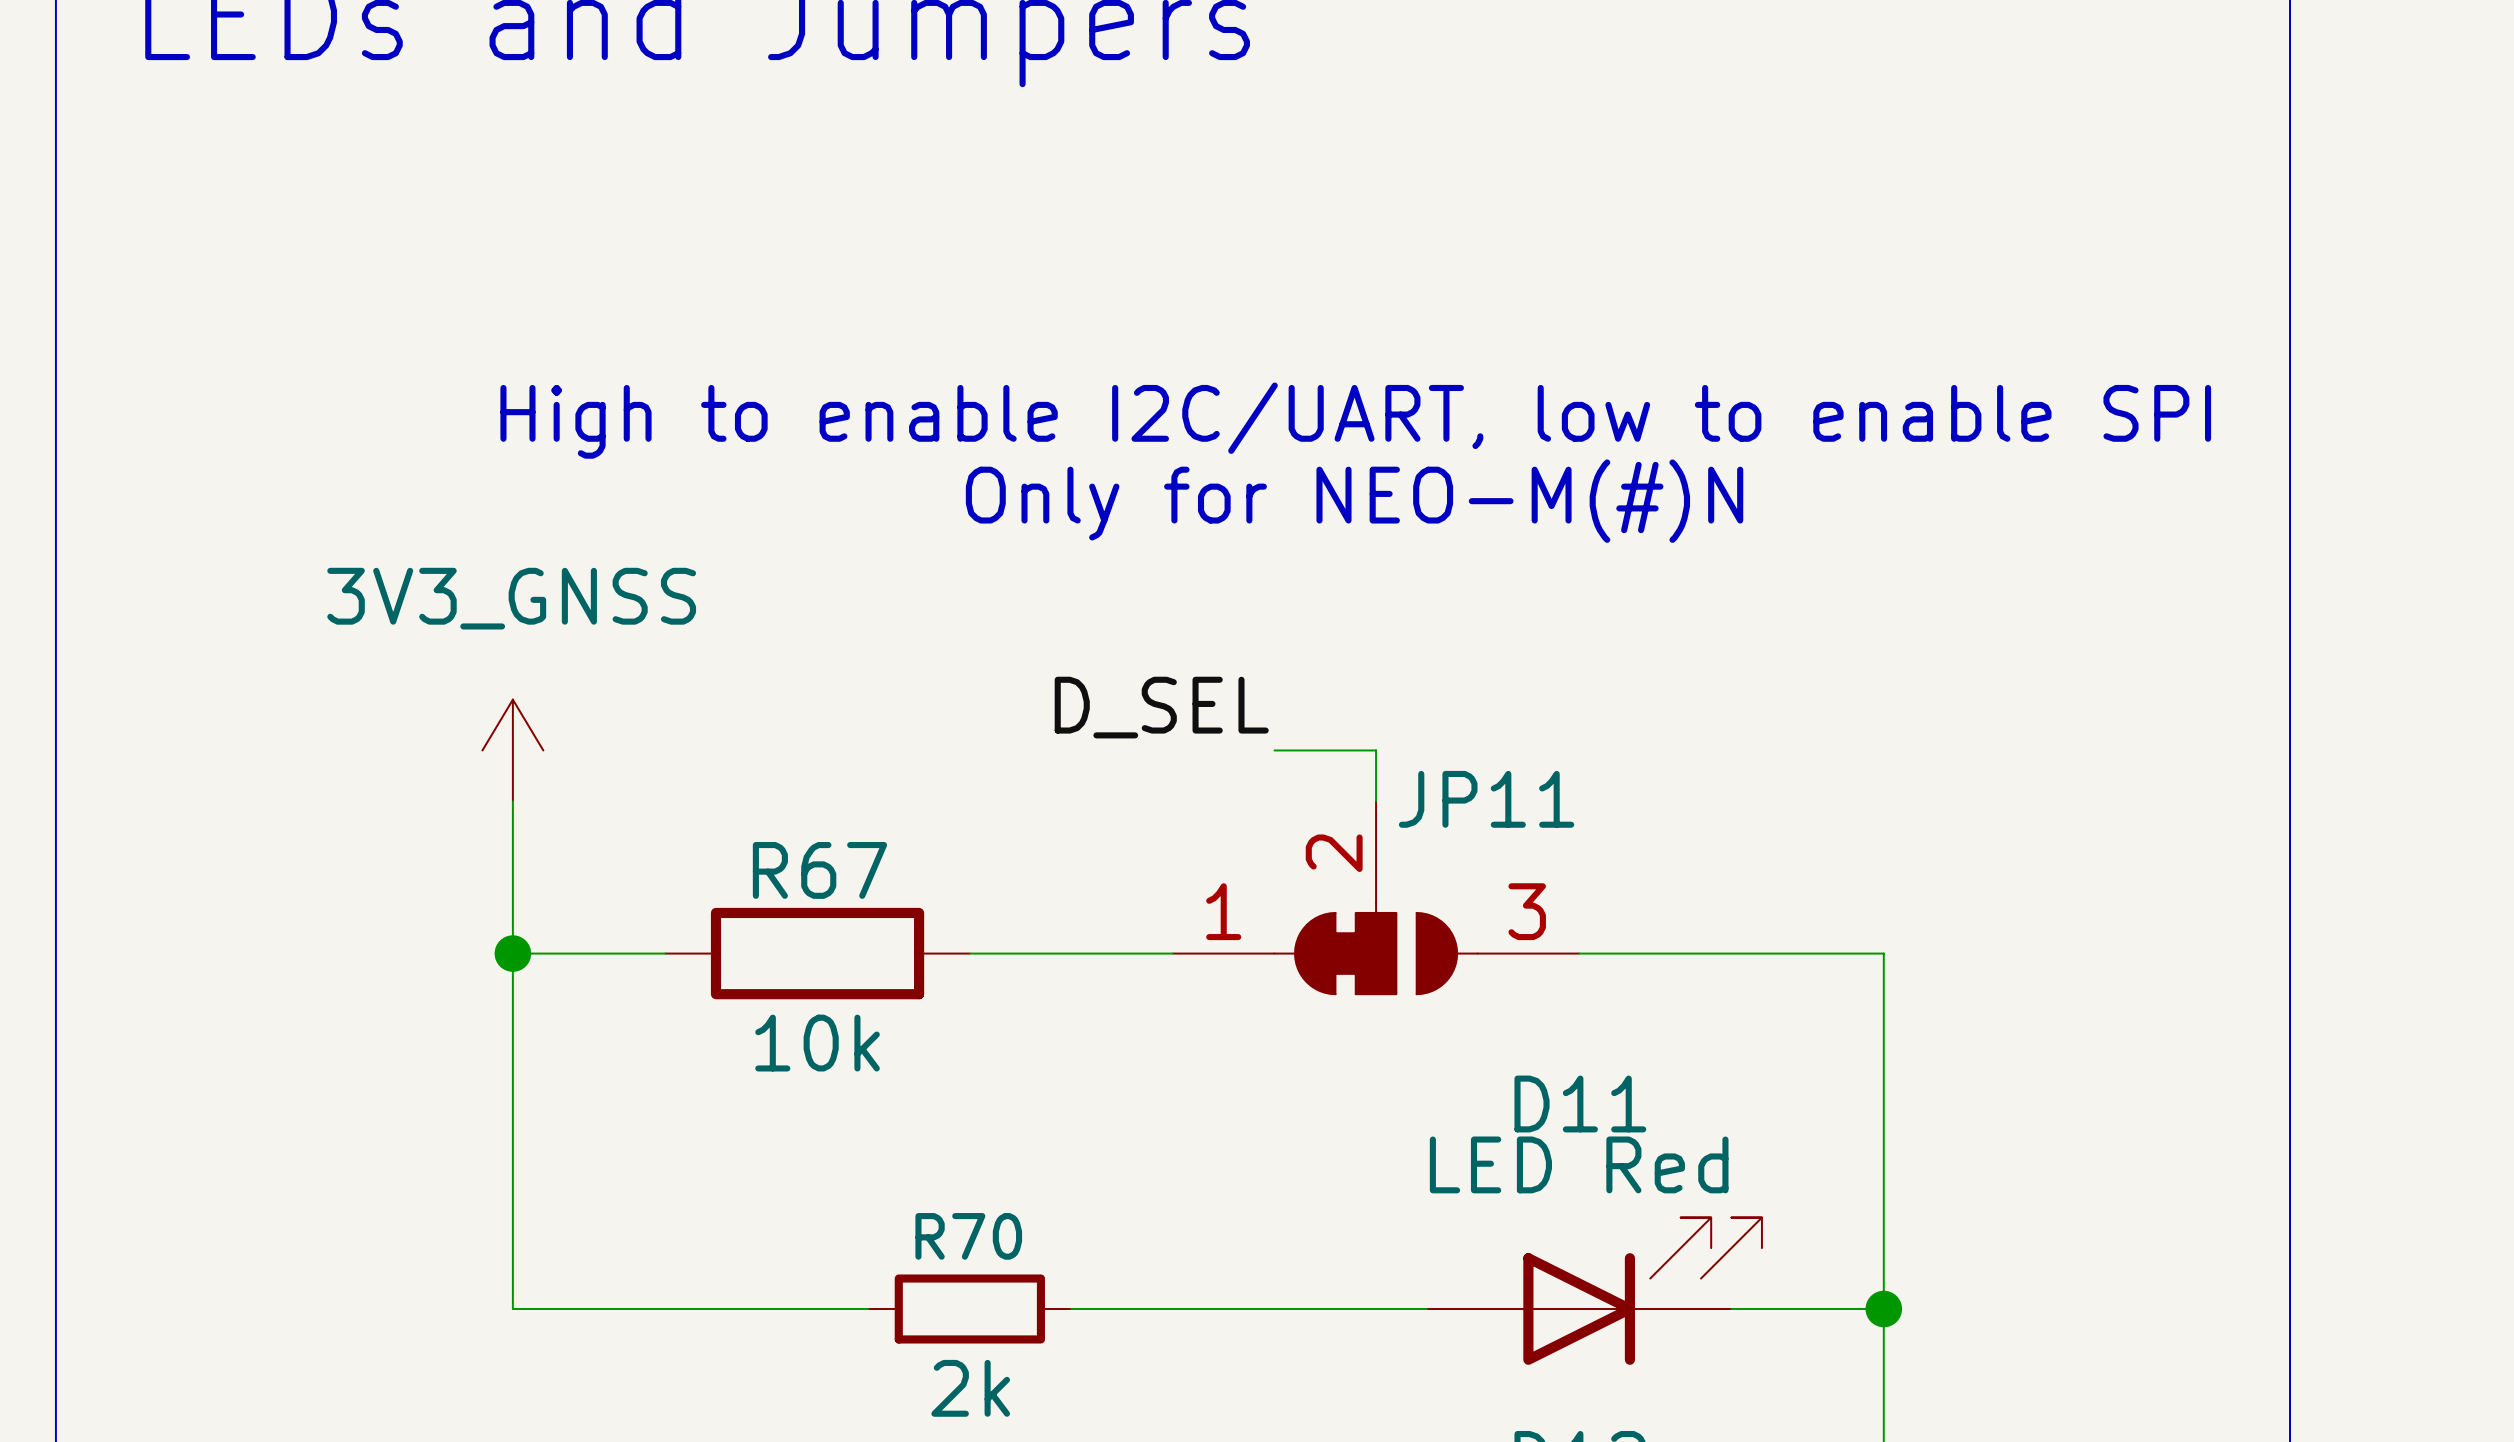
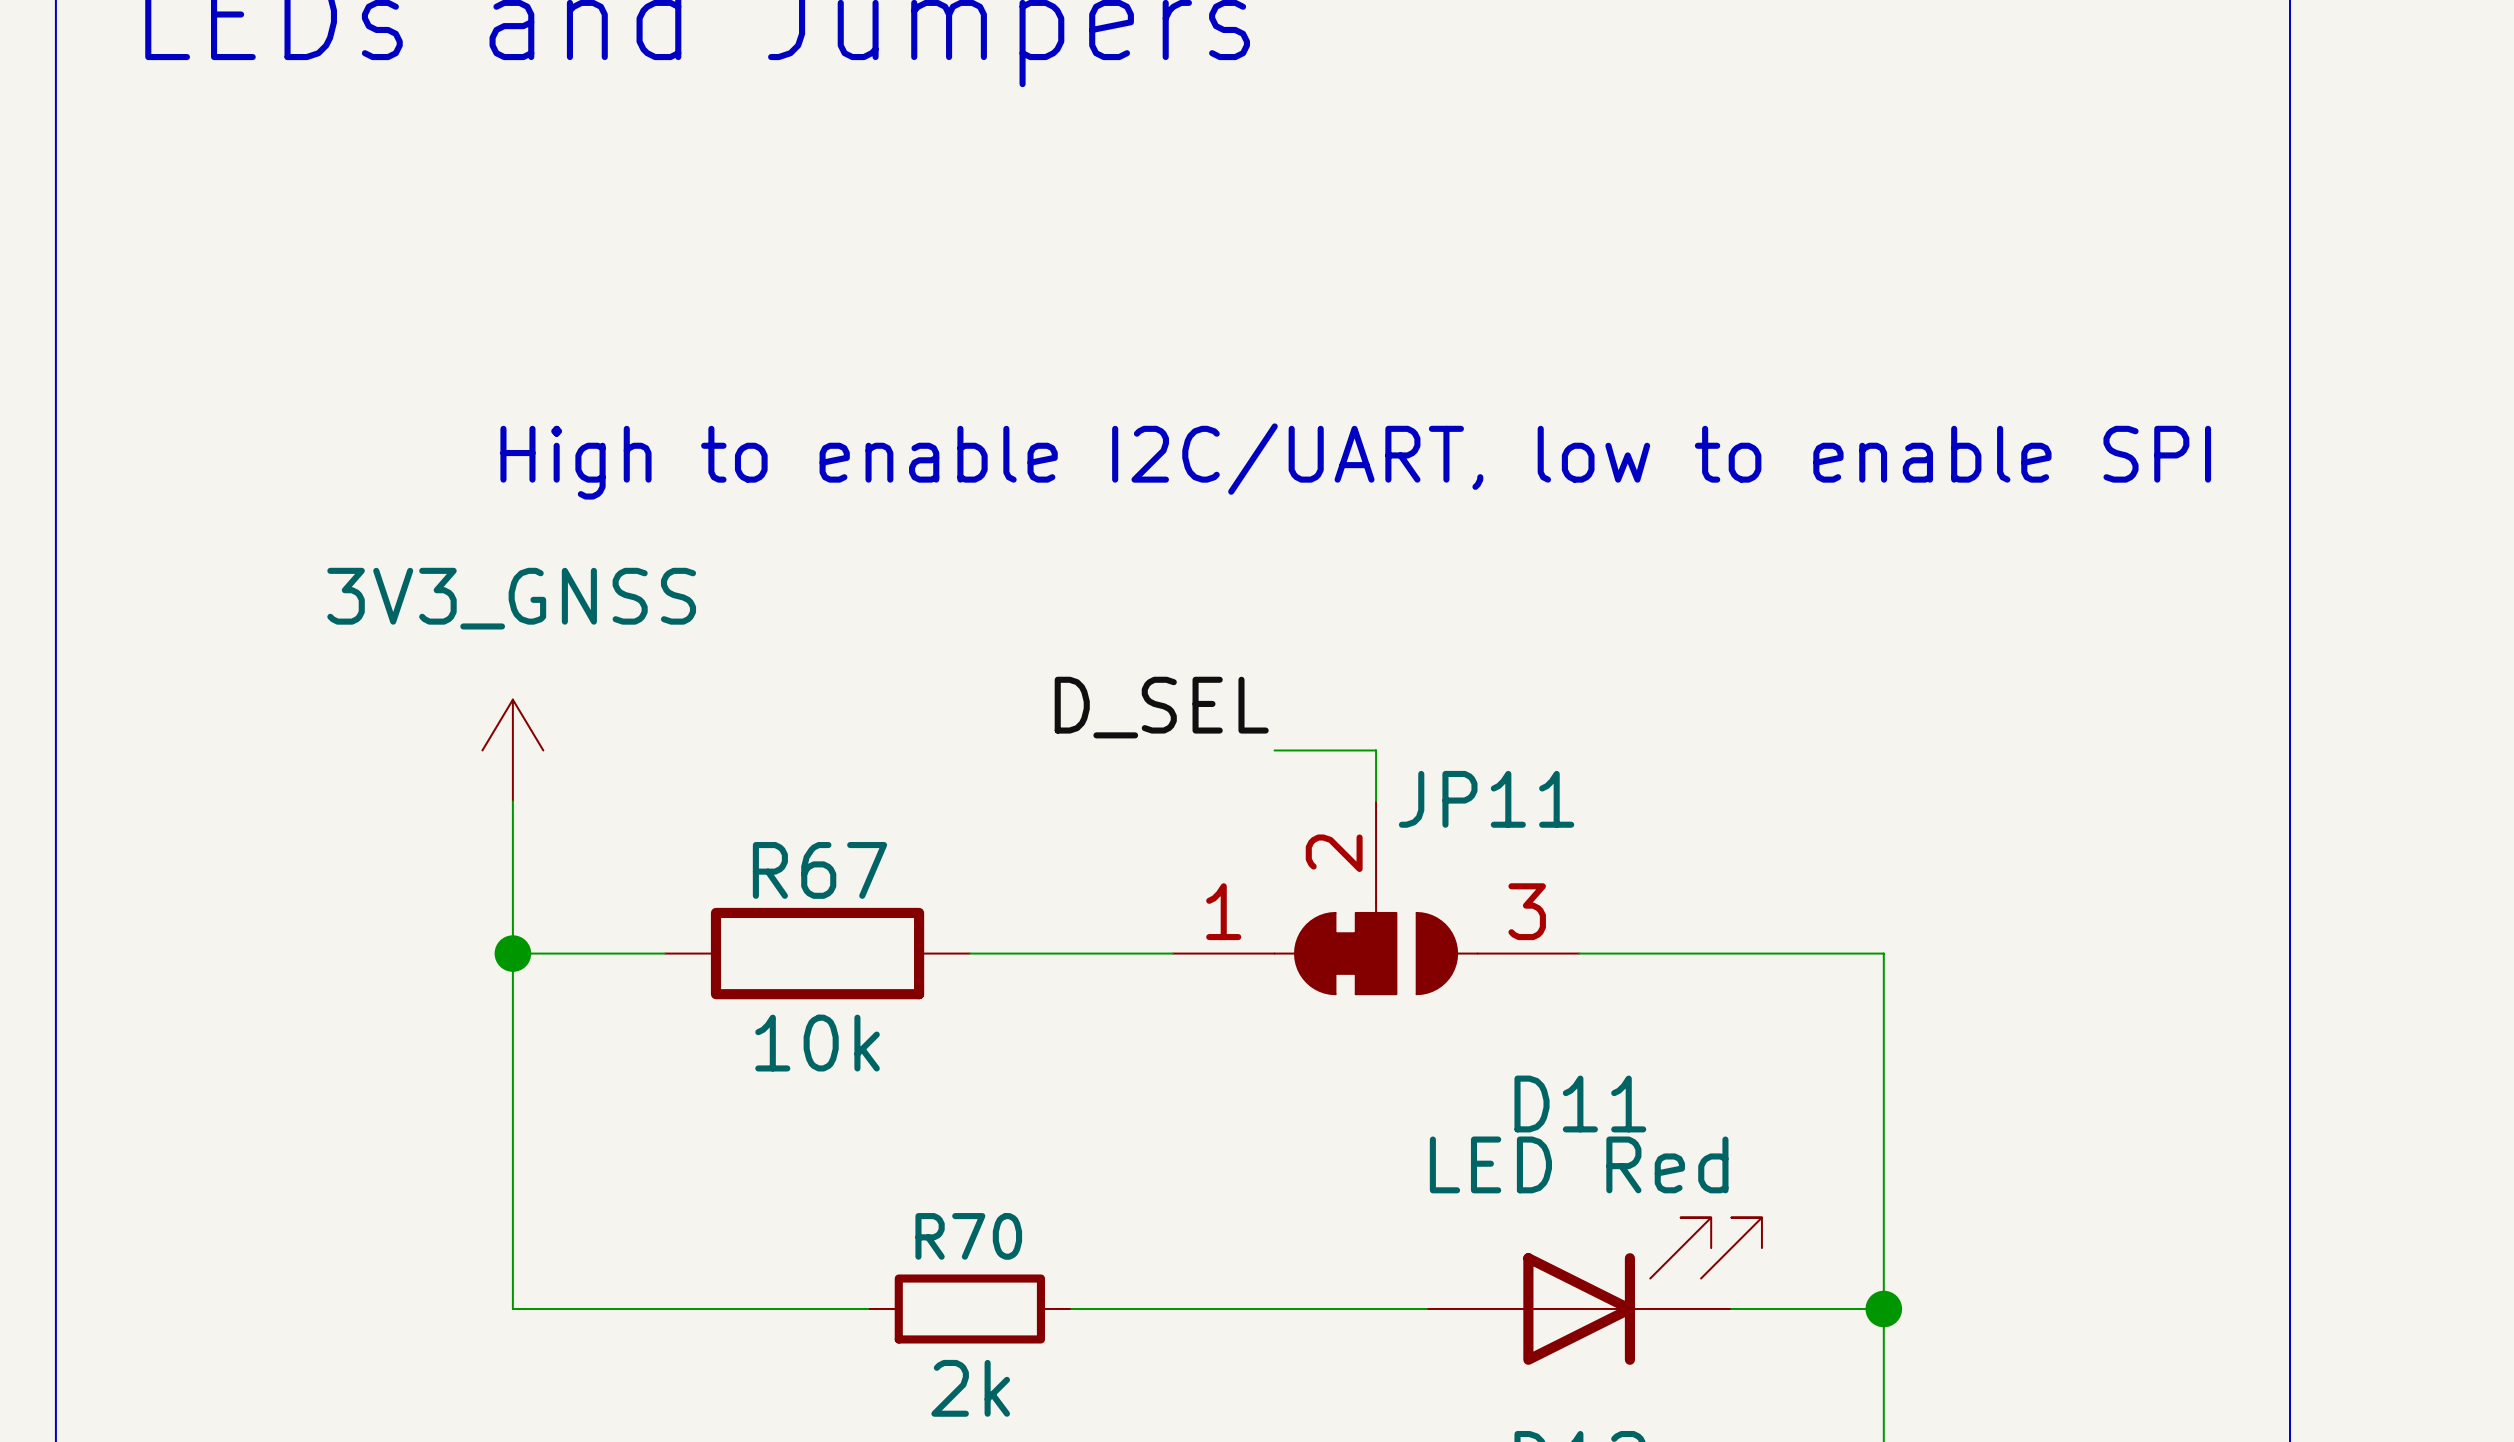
text position: High to enable I2C/UART, low to enable SPI (1355, 420) -> High to enable I2C/UART, low to enable SPI (1355, 461)
text: Only for NEO-M(#)N (1354, 501) -> none

